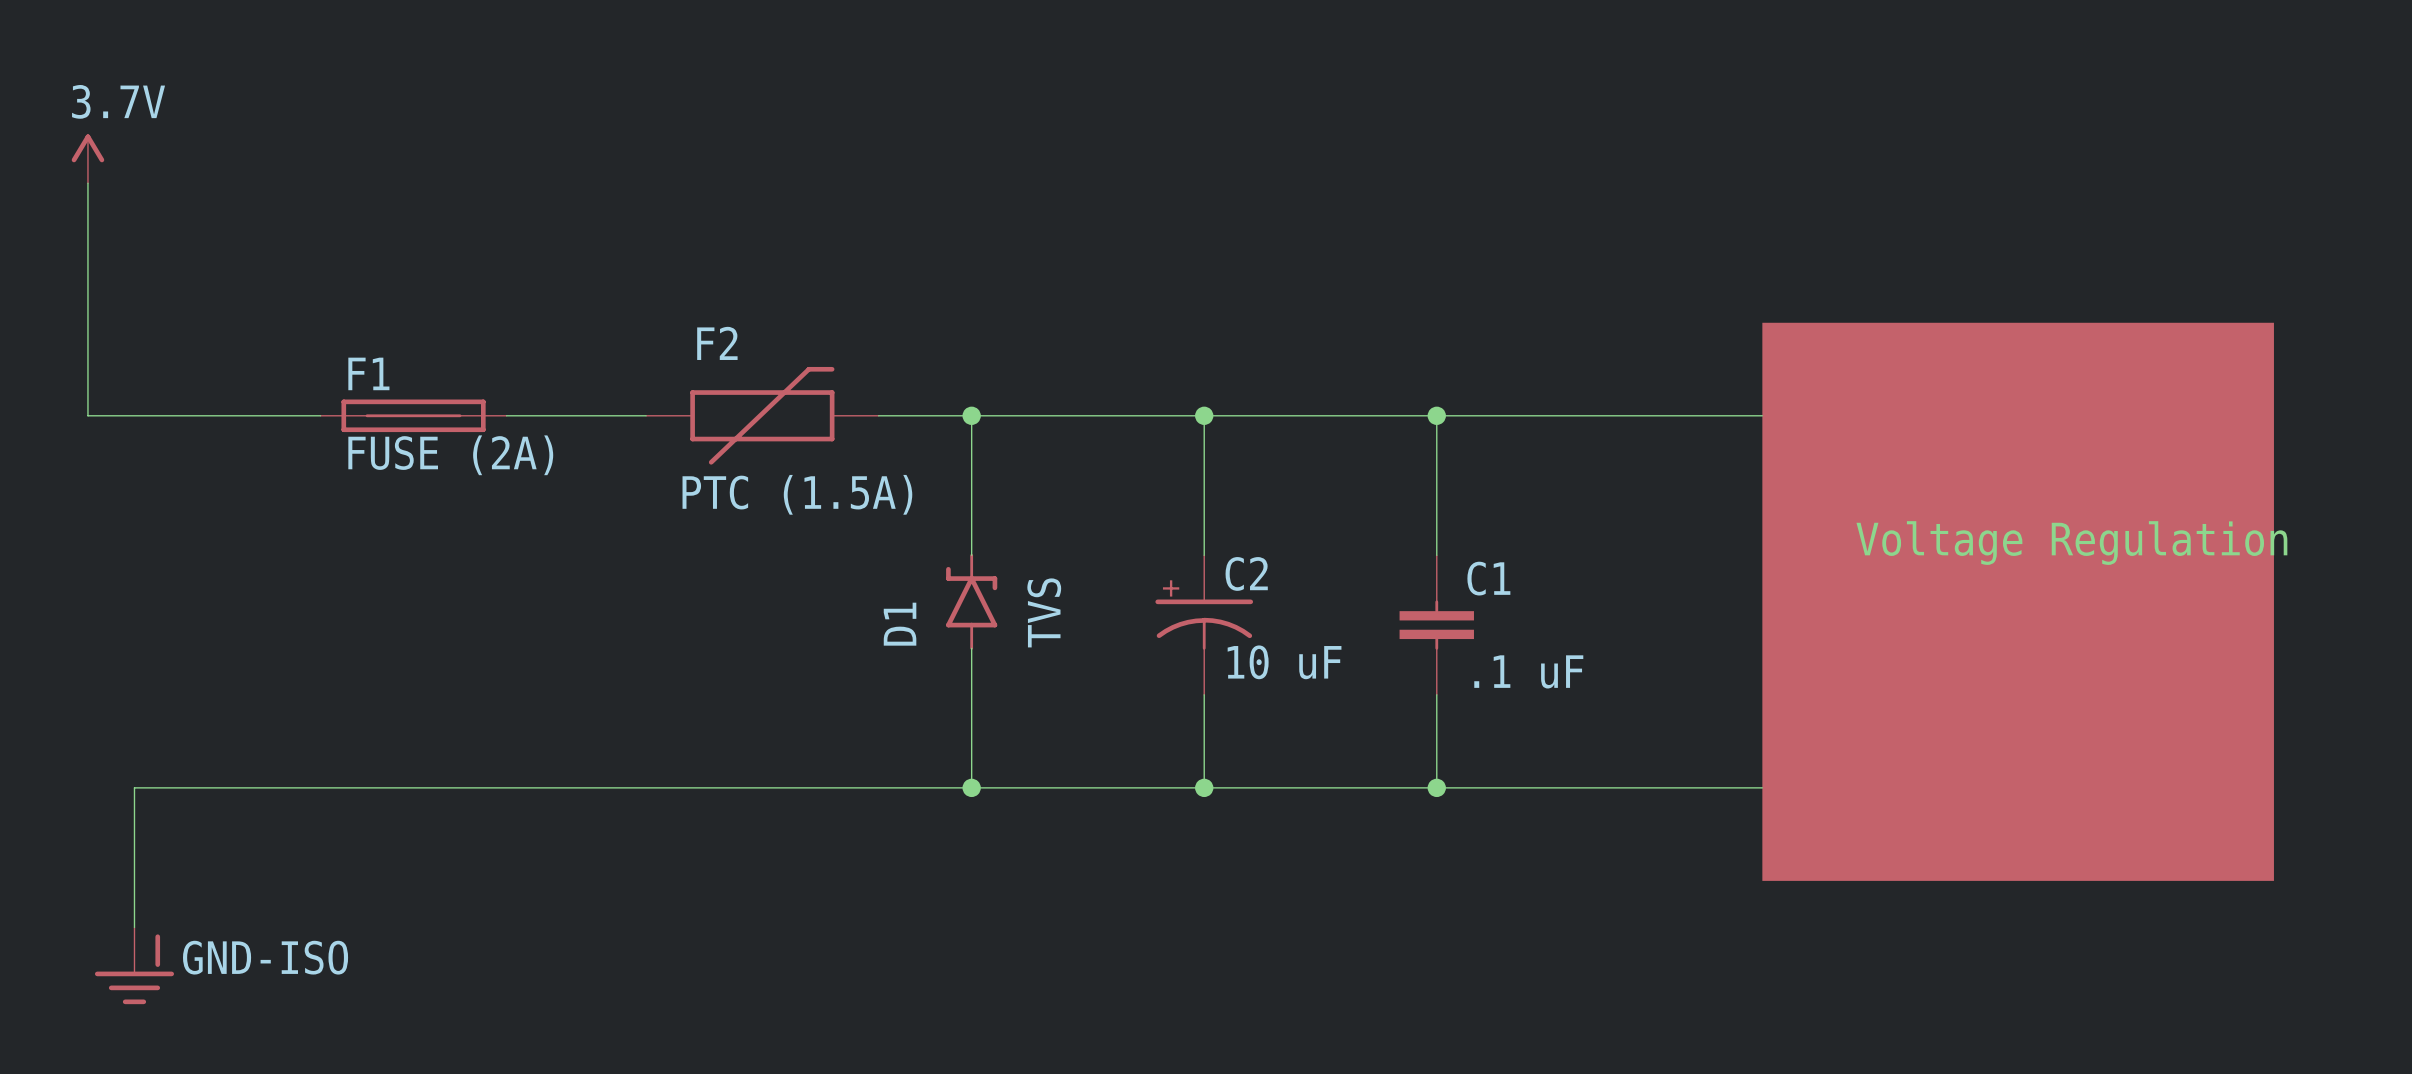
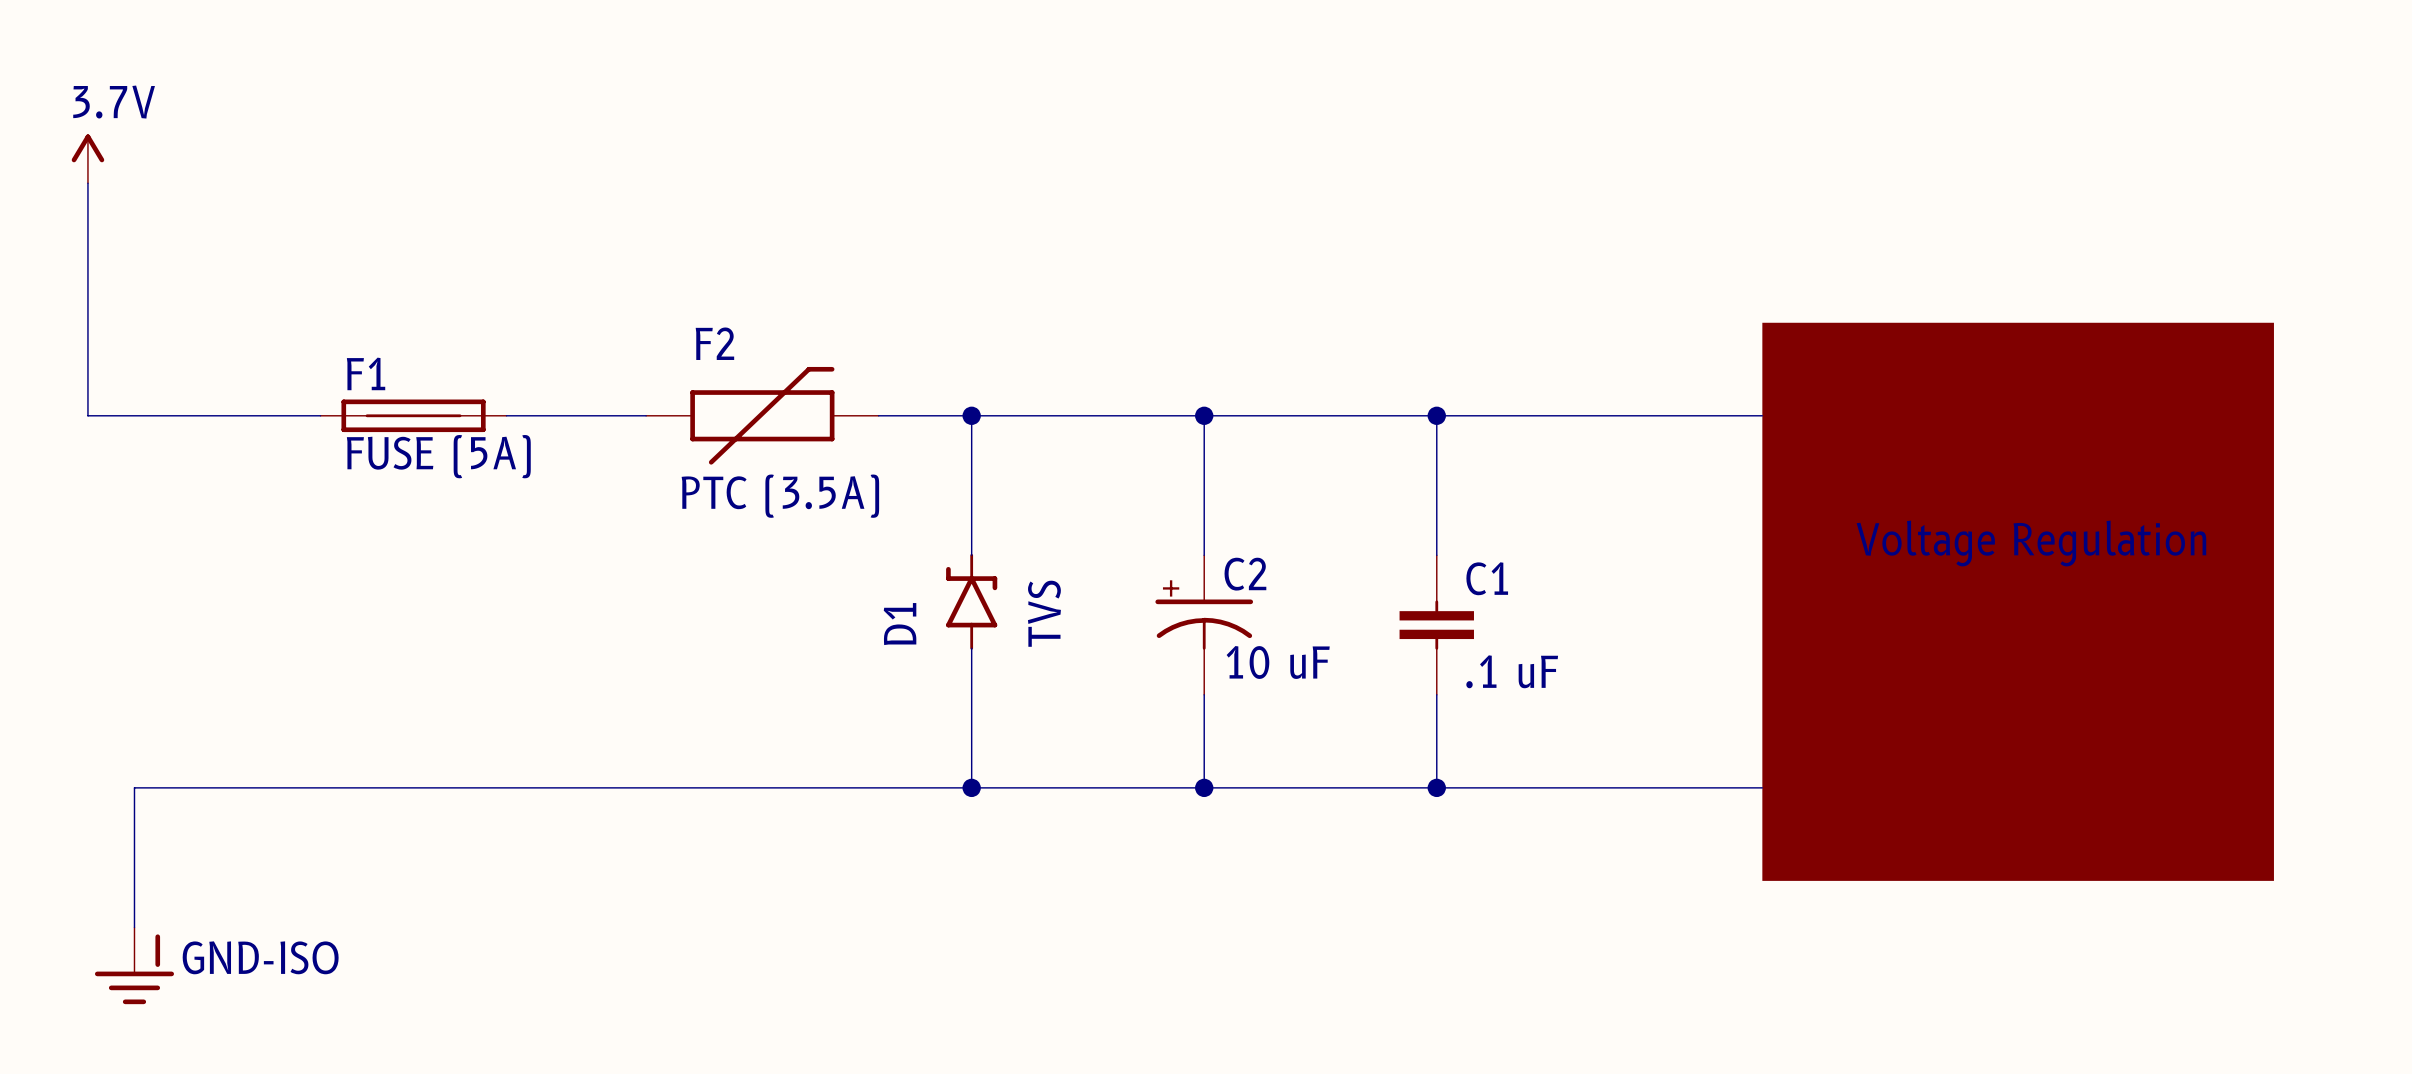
F1 value: FUSE (2A) (450, 455) -> FUSE (5A) (438, 456)
F2 value: PTC (1.5A) (797, 494) -> PTC (3.5A) (780, 496)

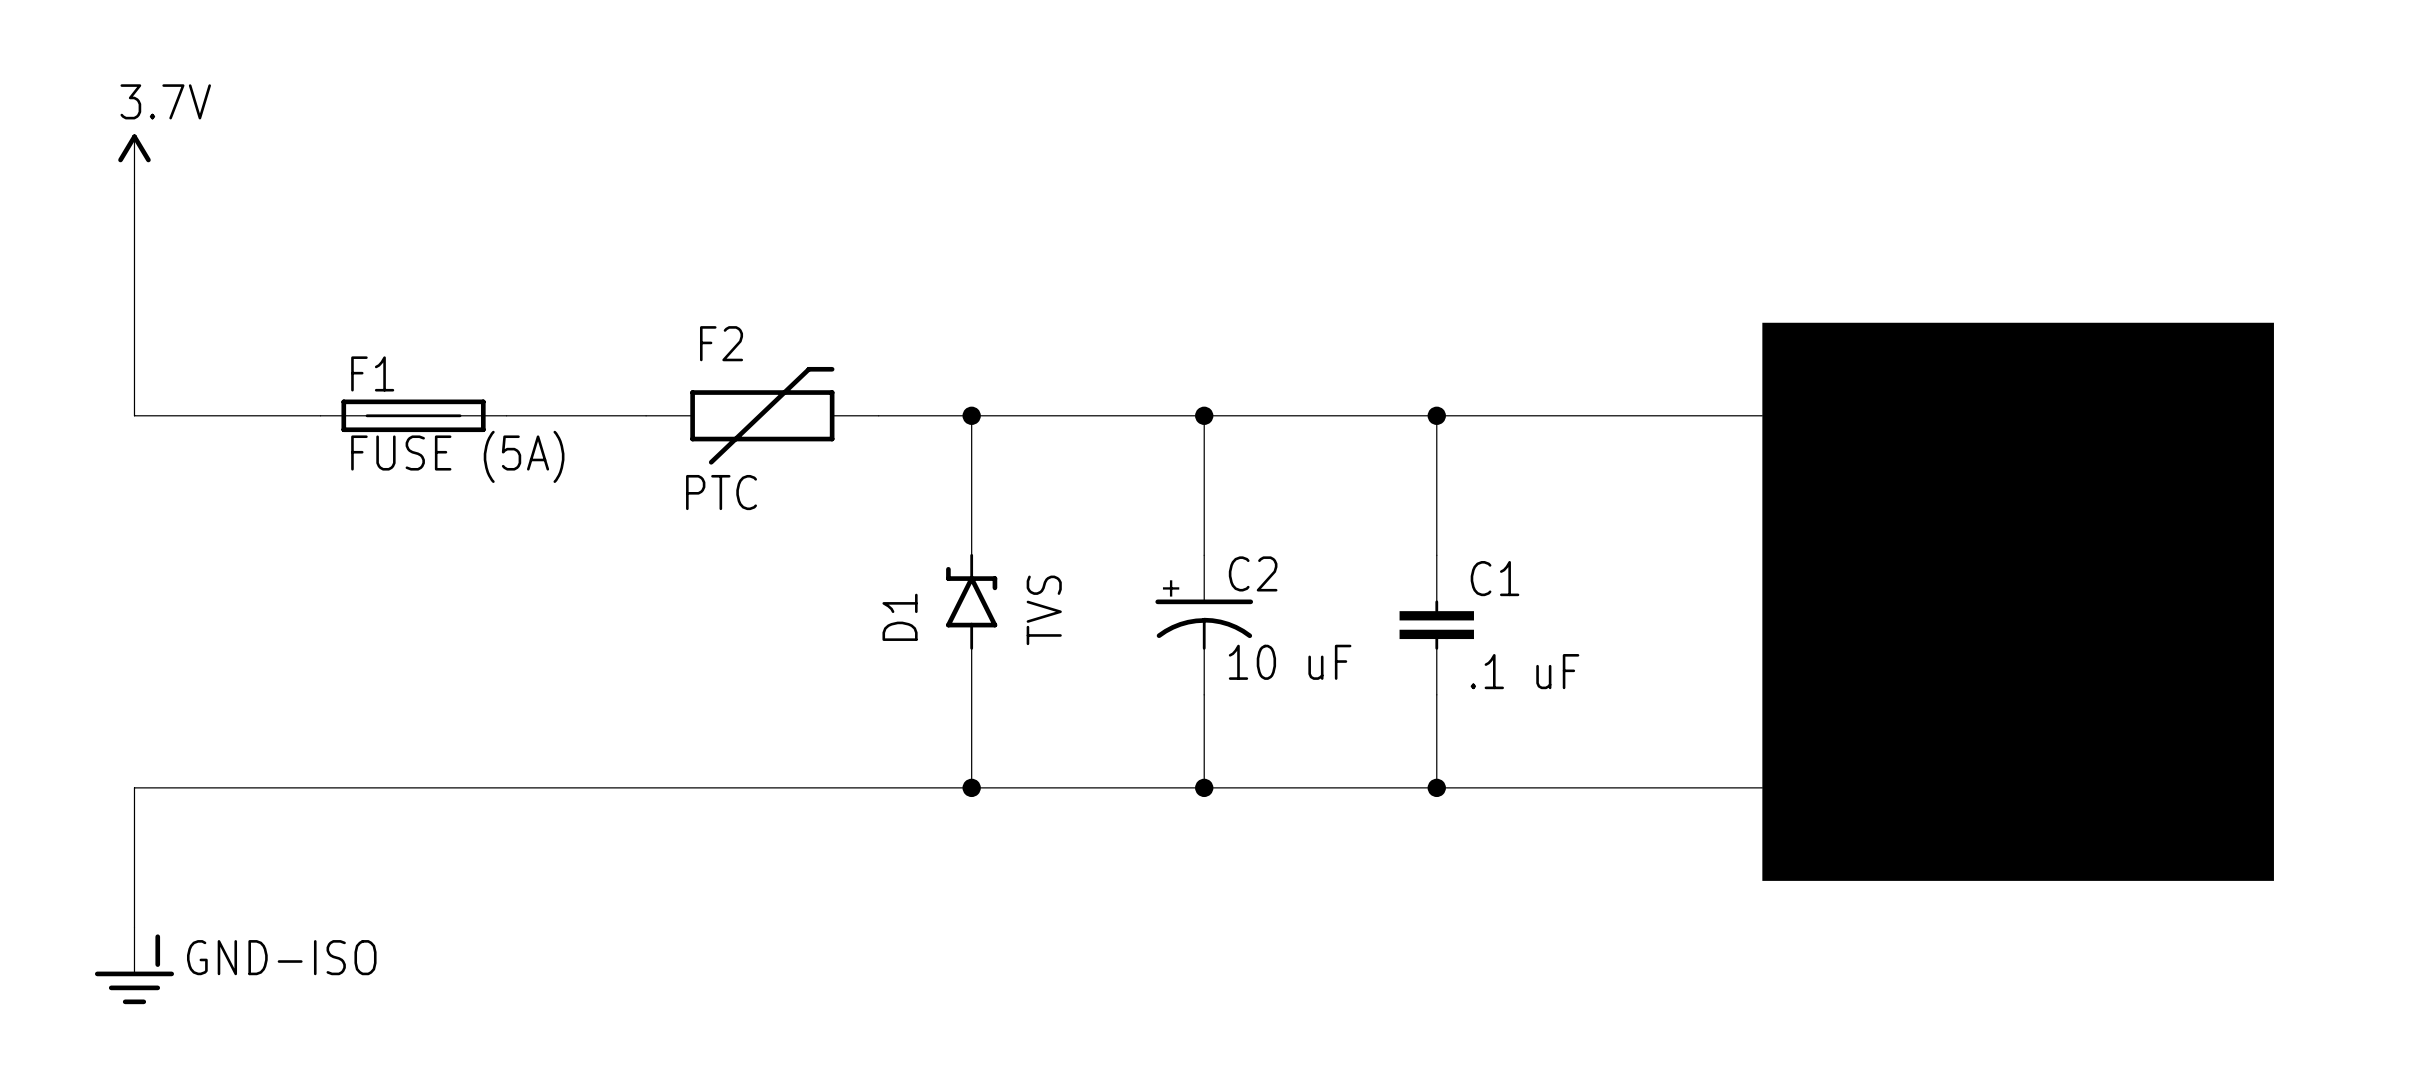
power symbol position: 3.7V (87, 158) -> 3.7V (134, 158)
wire: (87, 183) (87, 415) (134, 415) -> (134, 183) (134, 415)
F2 value: PTC (3.5A) (780, 496) -> PTC (721, 492)

